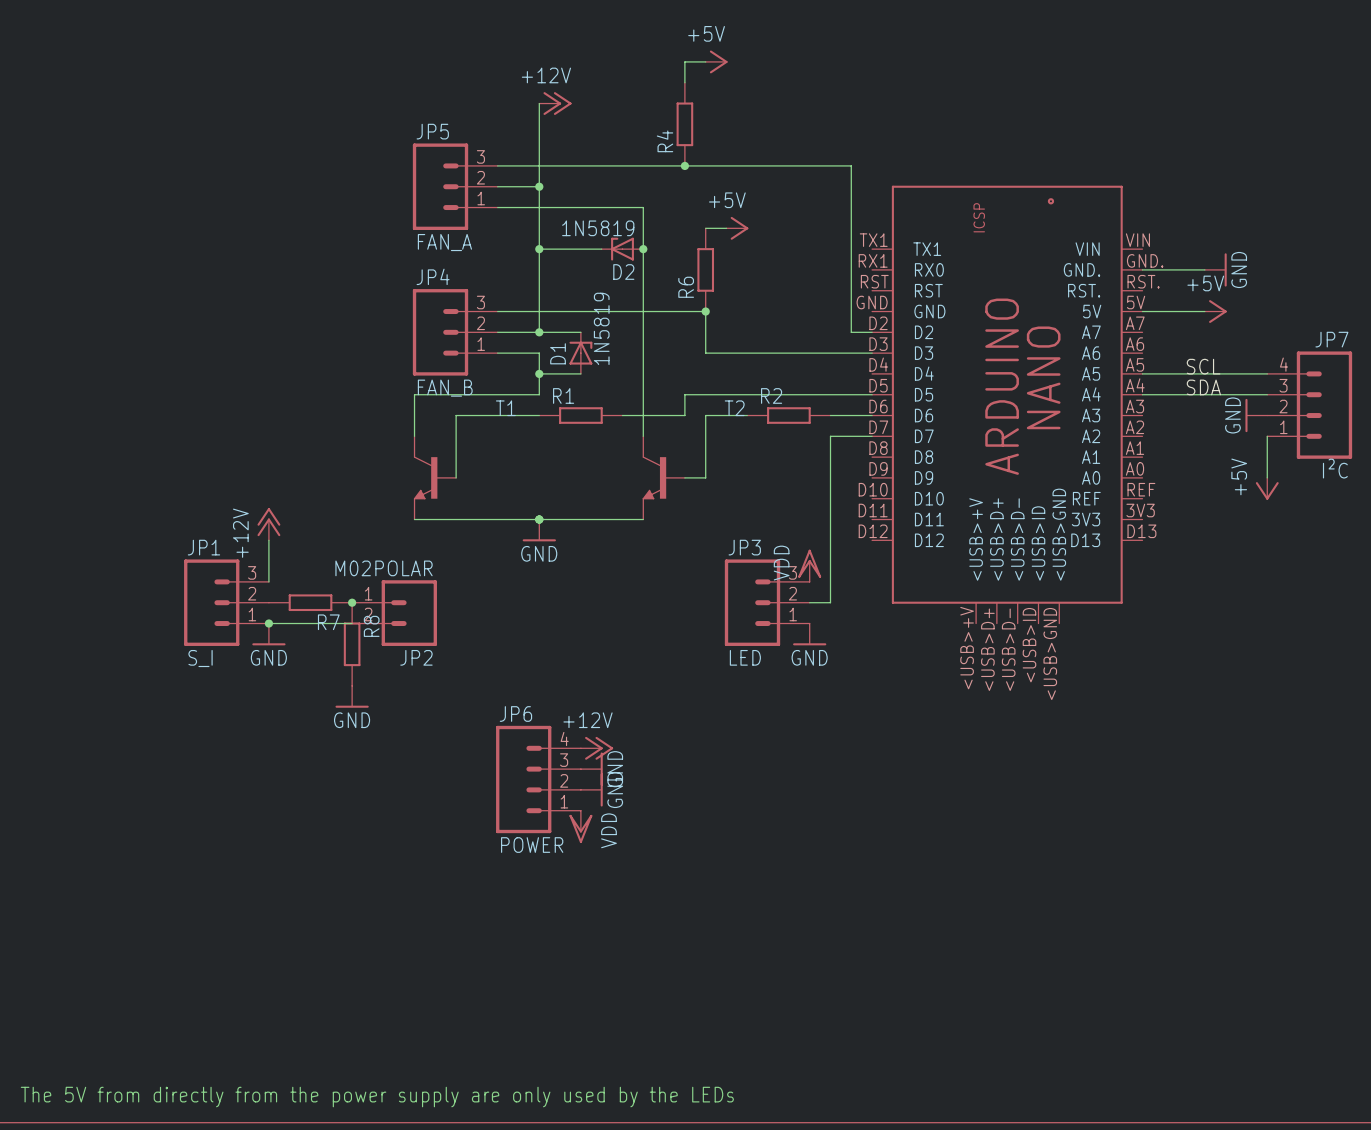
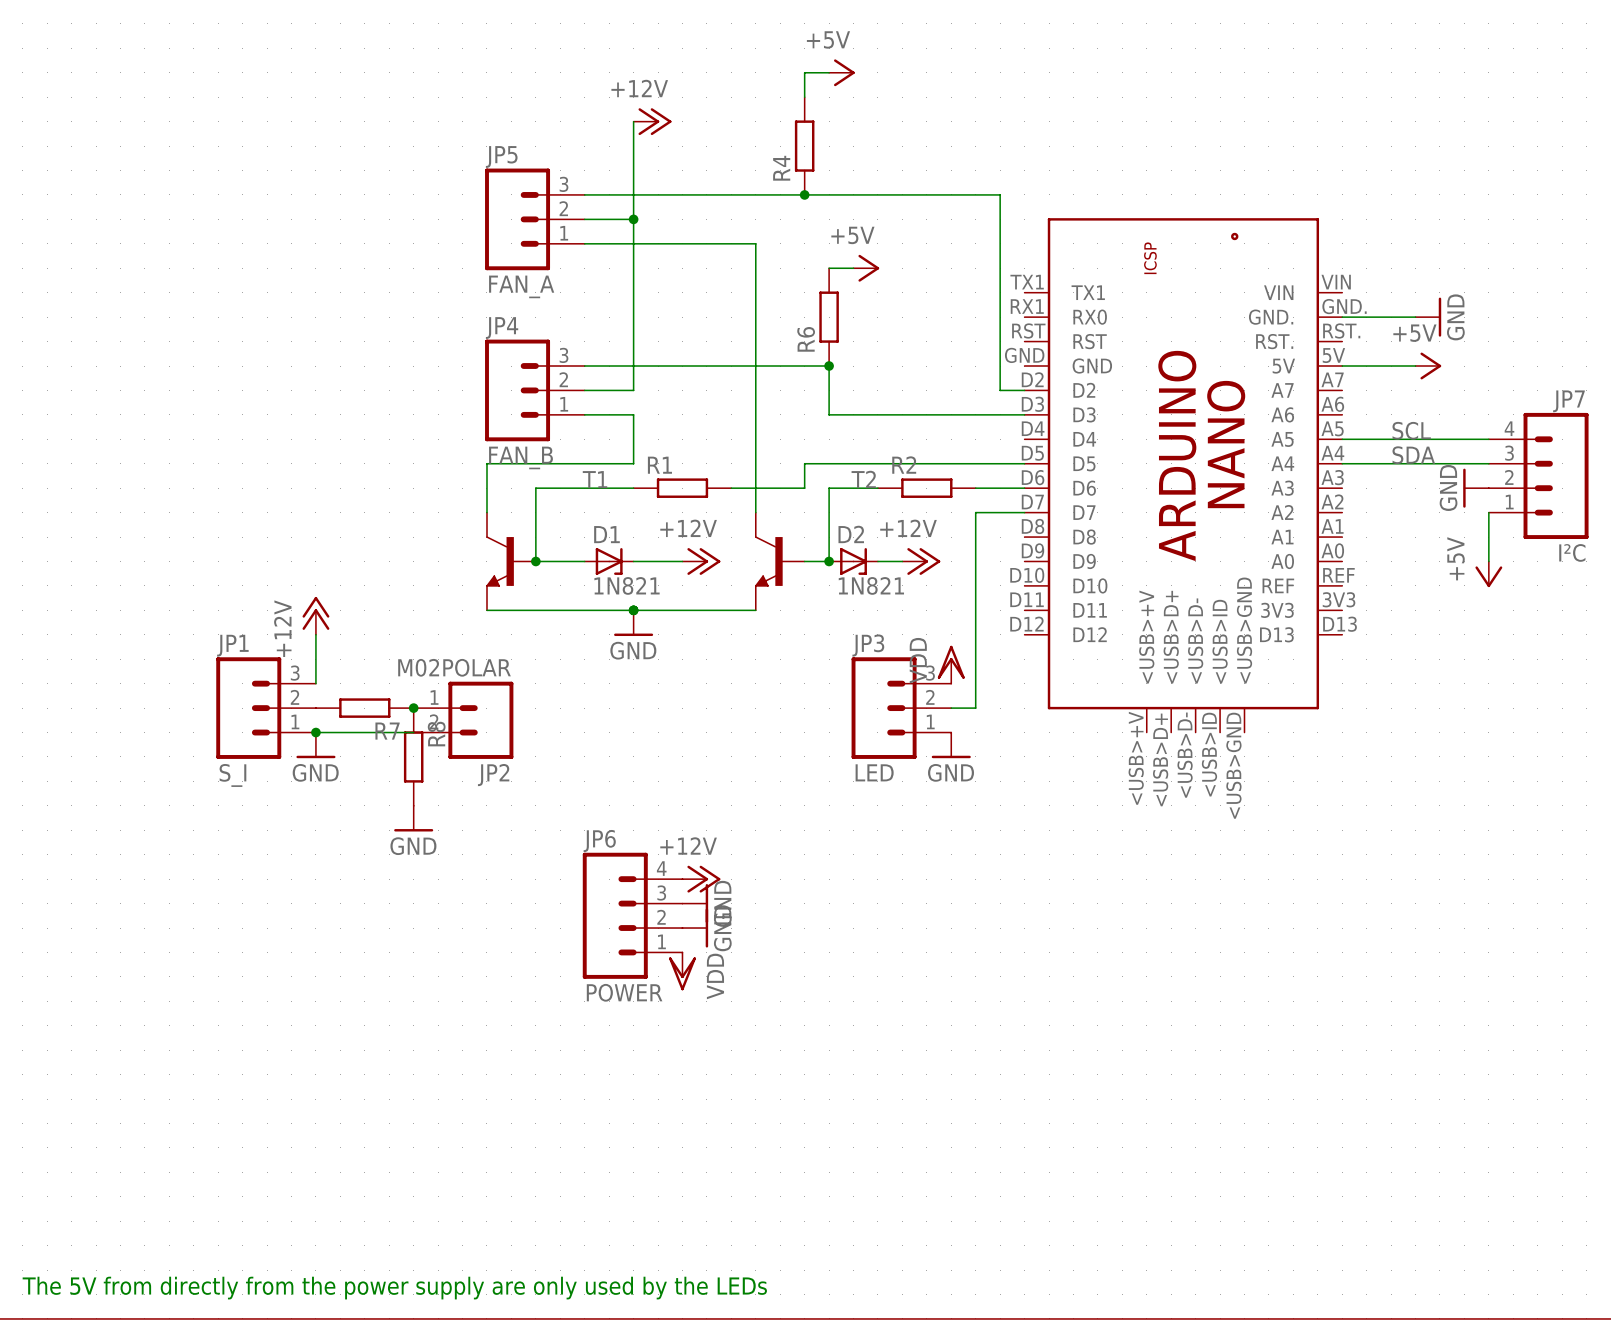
D2 value: 1N5819 (598, 228) -> 1N821 (871, 585)
wire: (539, 249) (601, 249) -> none
junction: (539, 249) -> none
D2 rotation: 0° (622, 249) -> 180° (853, 561)
D2 position: (622, 249) -> (853, 561)
junction: (643, 249) -> none
D1 value: 1N5819 (601, 328) -> 1N821 (627, 585)
wire: (539, 332) (580, 332) -> (535, 561) (584, 561)
junction: (539, 332) -> none
D1 rotation: 0° (580, 353) -> 90° clockwise (609, 561)
D1 position: (580, 353) -> (609, 561)
wire: (539, 373) (580, 373) -> (633, 561) (682, 561)
junction: (539, 373) -> none
junction: none -> (535, 561)
power symbol: none -> +12V (701, 561)
junction: none -> (829, 561)
wire: none -> (877, 561) (902, 561)
power symbol: none -> +12V (921, 561)

